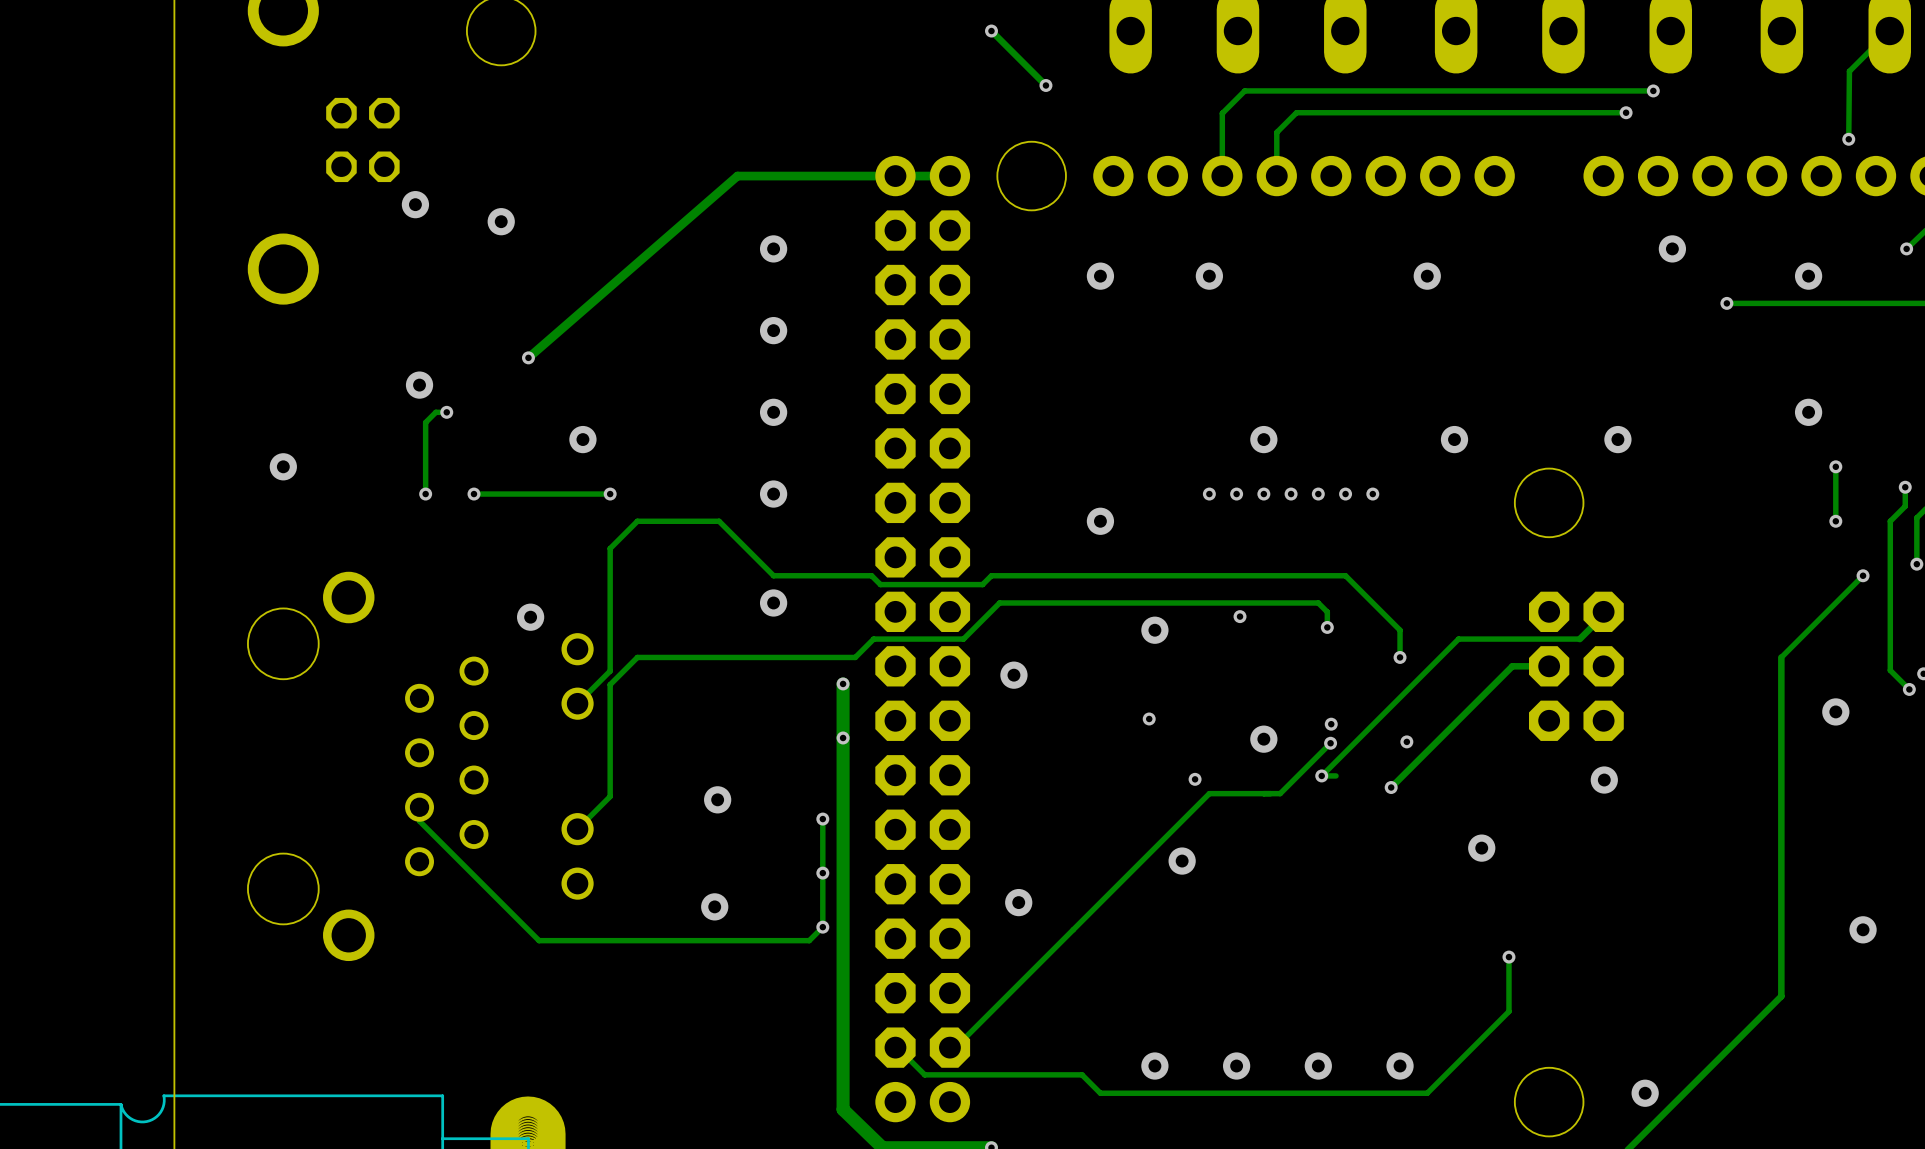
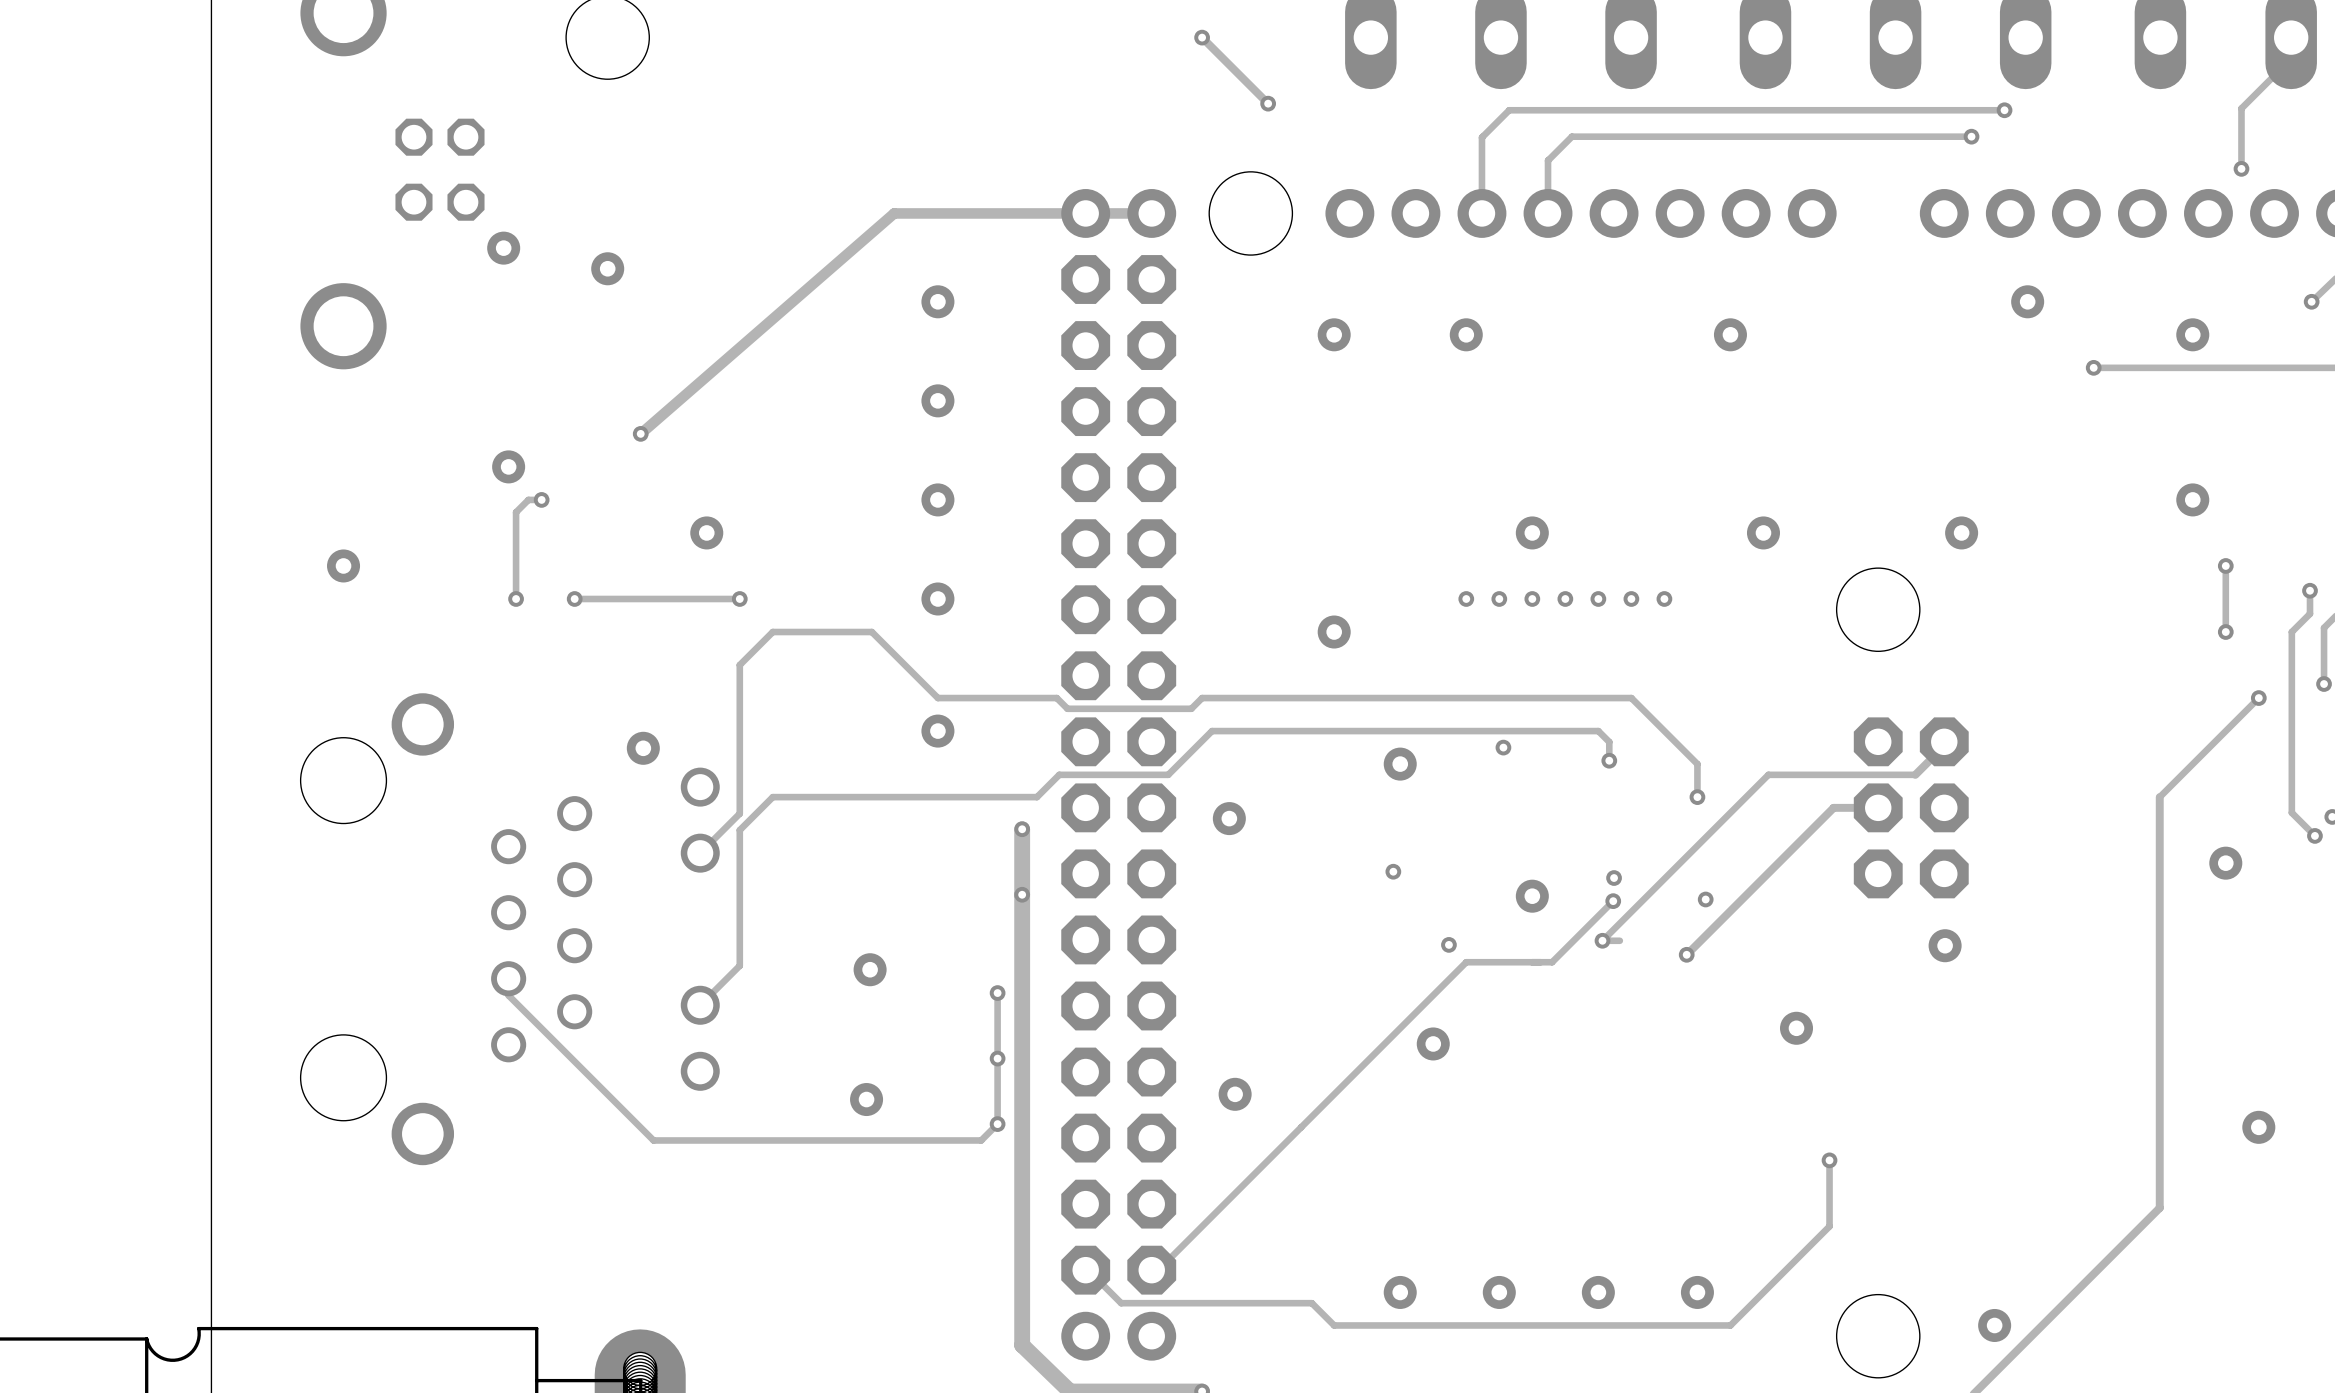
track: (1889, 31) (1849, 71) (1848, 139) -> (2307, 42) (2241, 108) (2241, 168)

